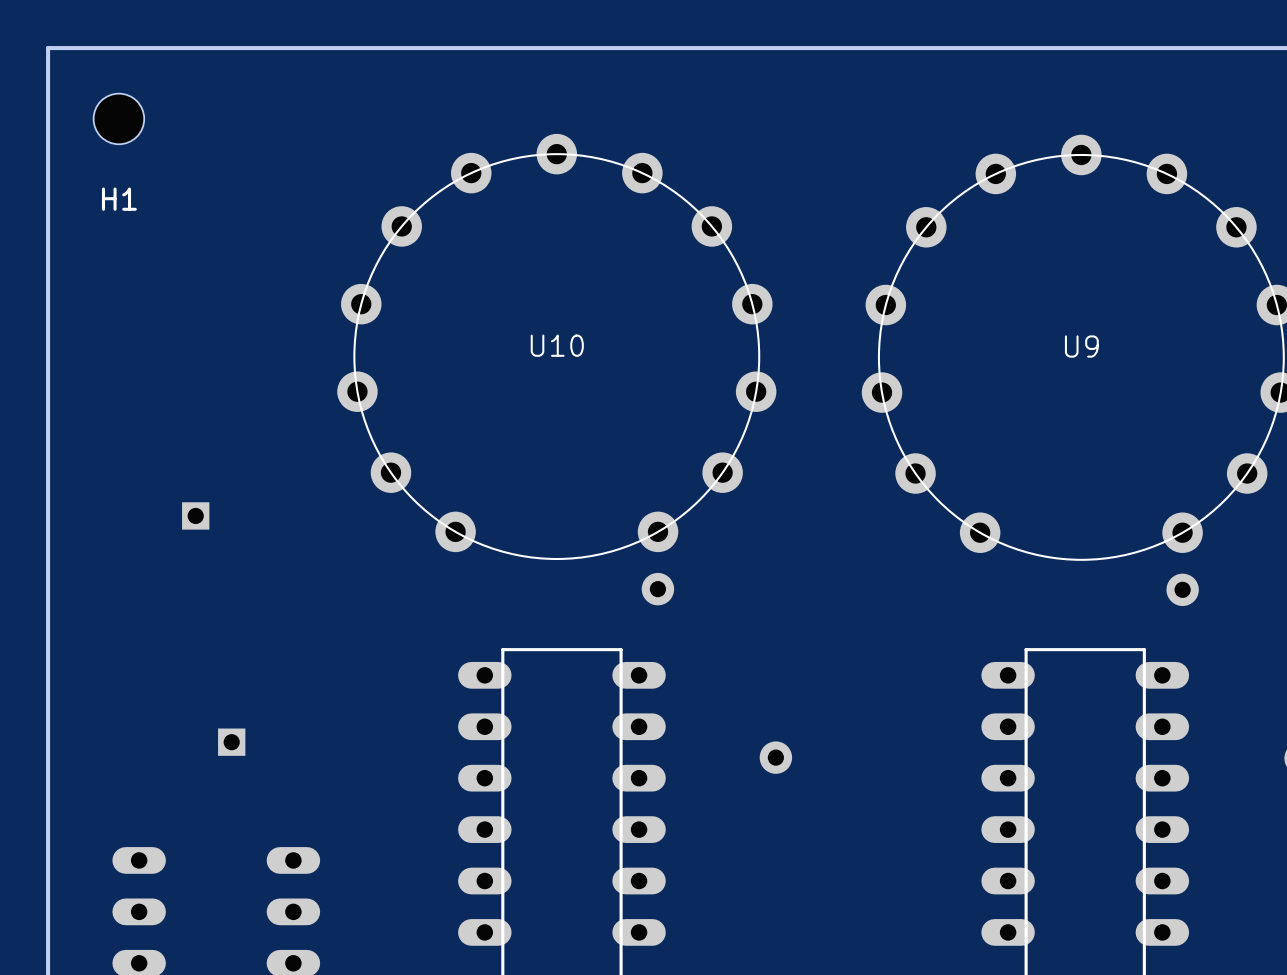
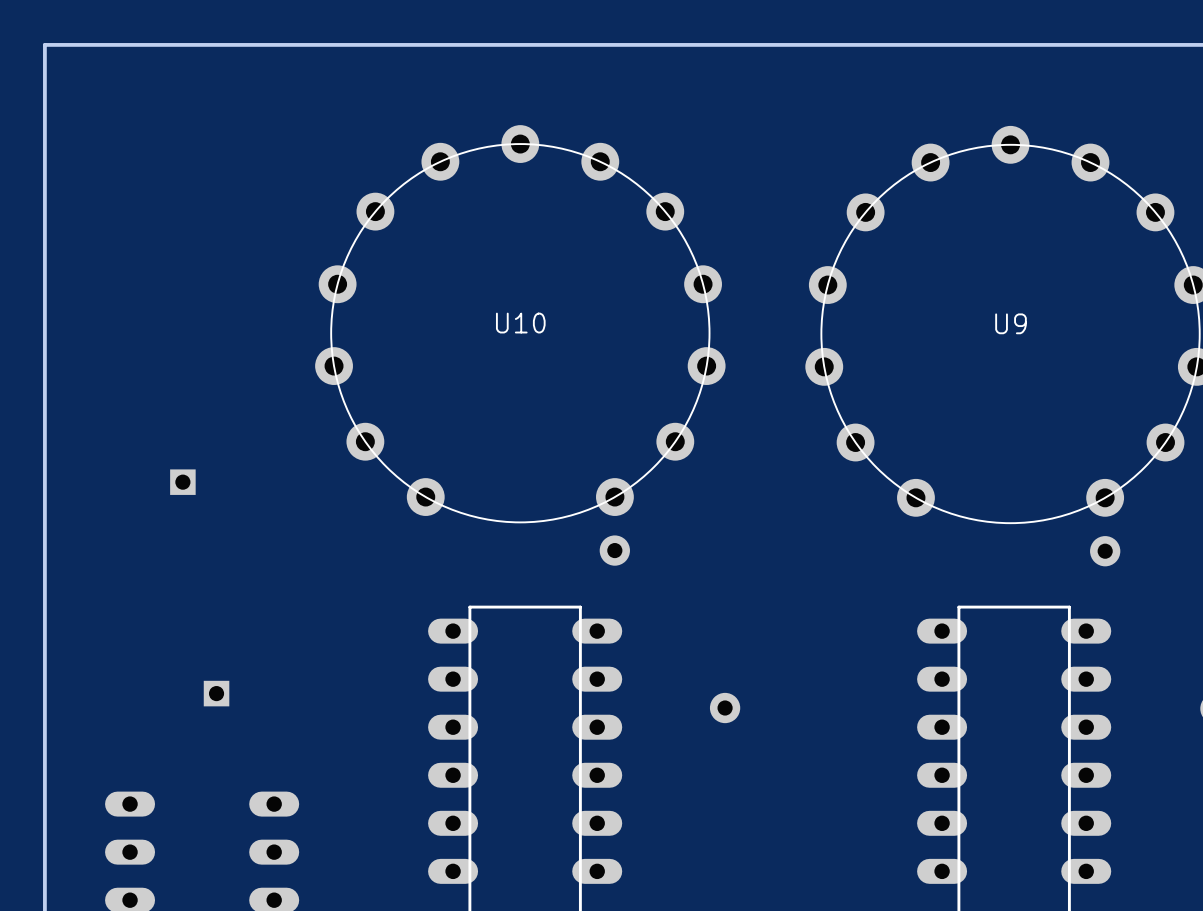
H1: (118, 118) -> none

